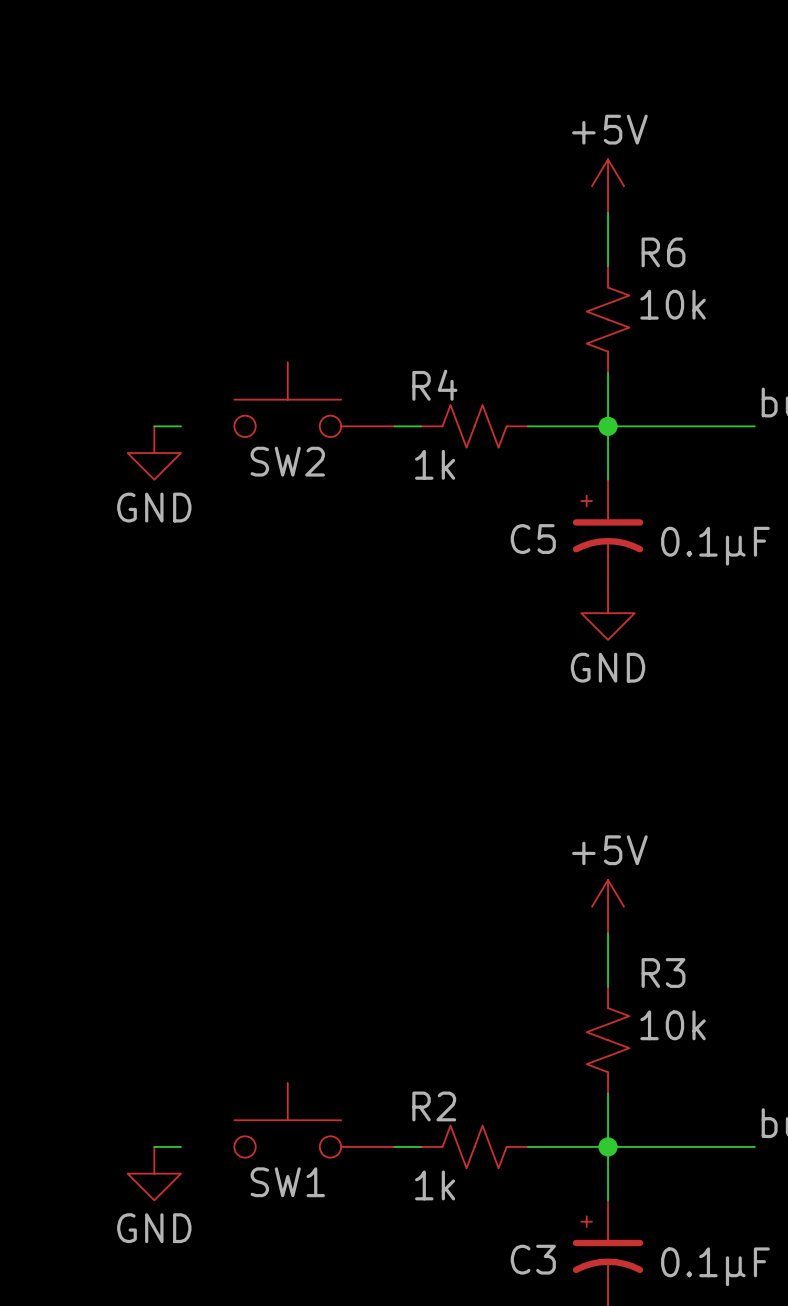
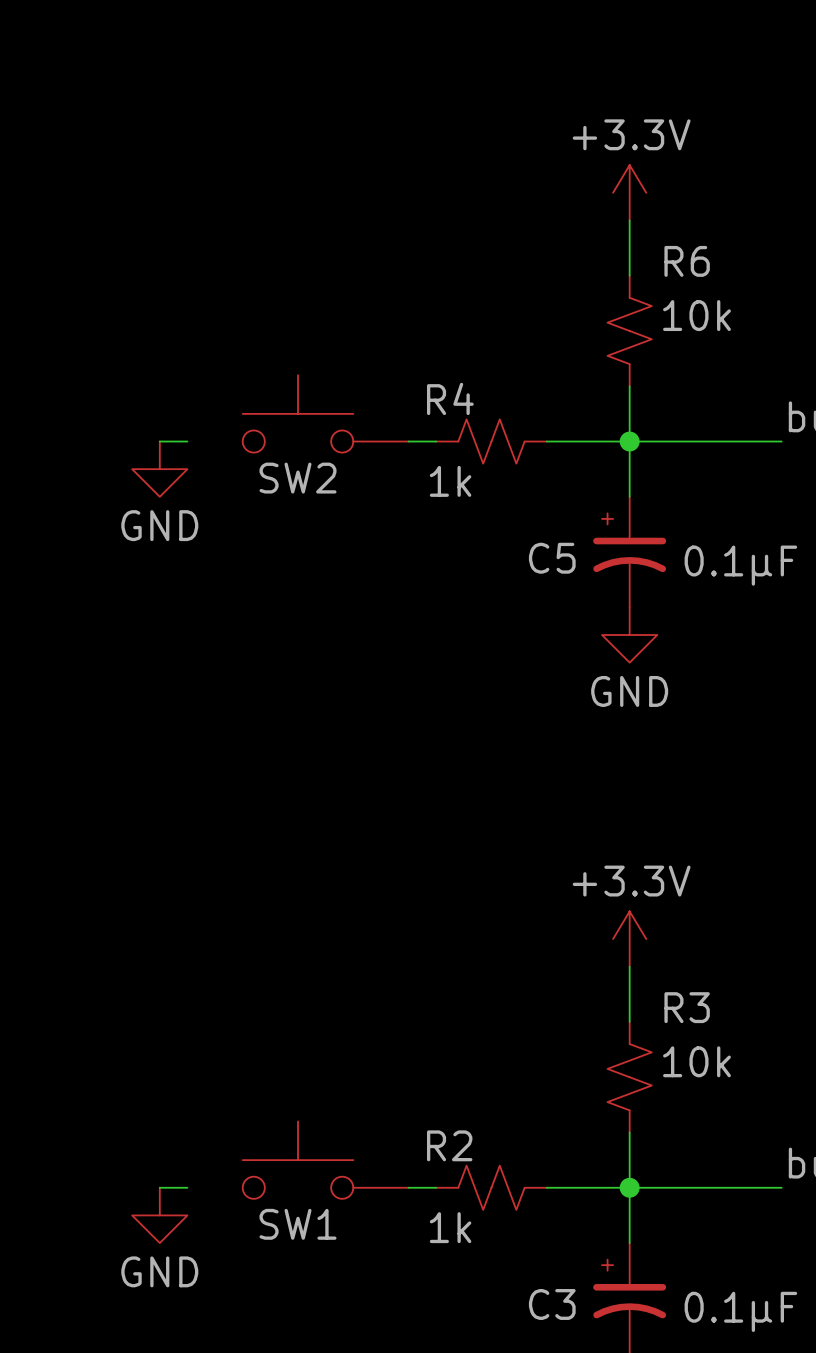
power symbol: +5V (608, 186) -> +3.3V (629, 192)
power symbol: +5V (608, 906) -> +3.3V (629, 939)

